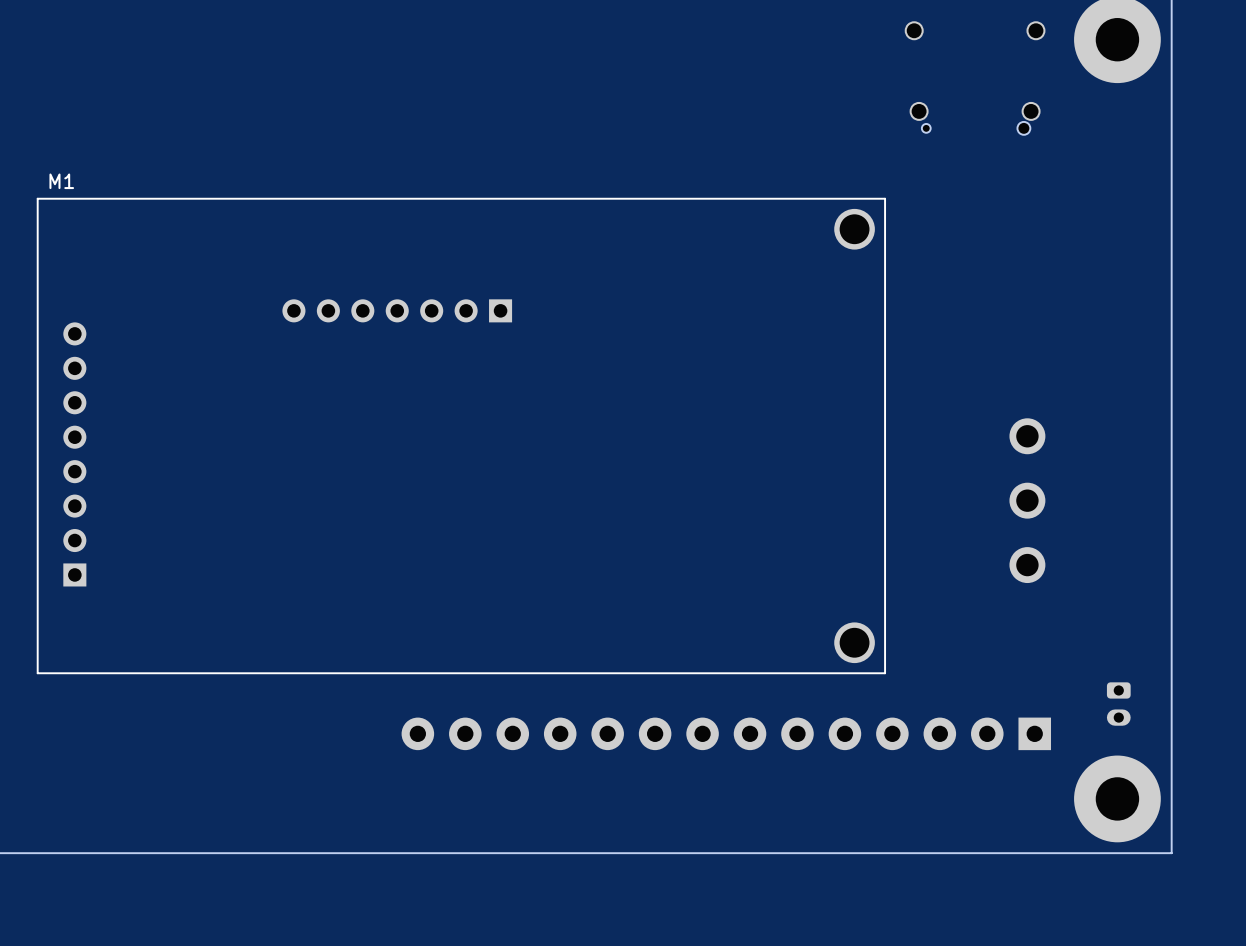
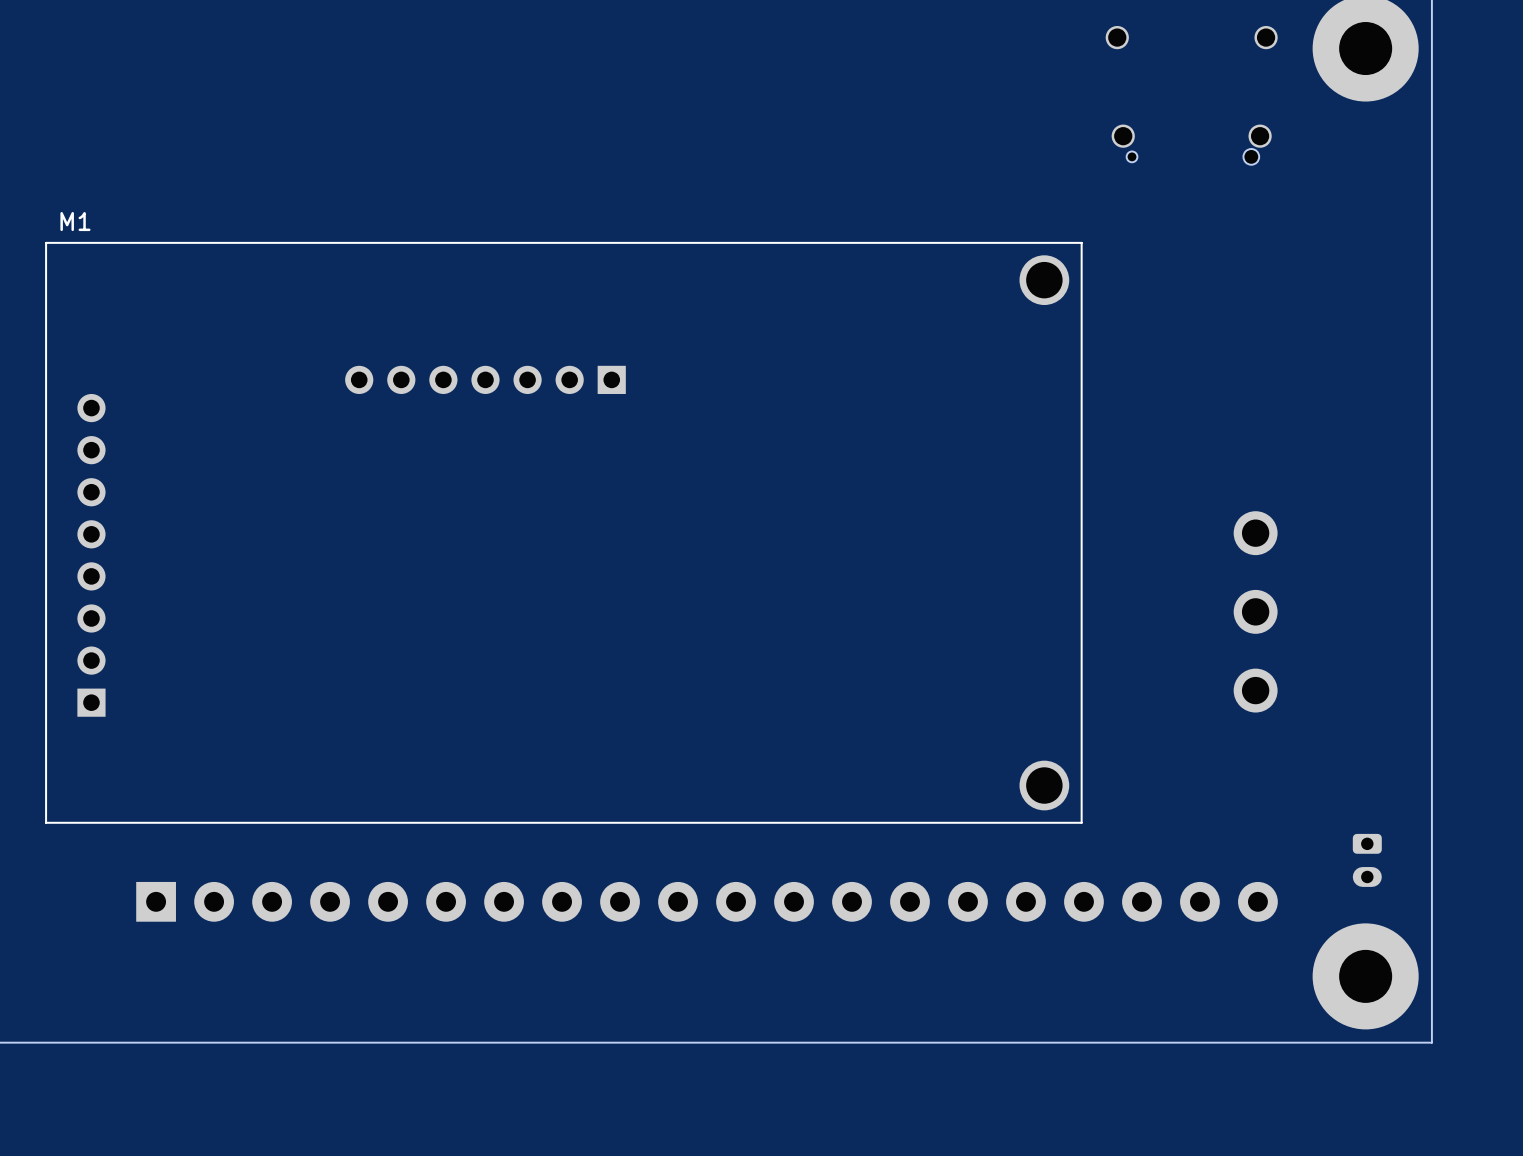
part: (726, 733) -> none
part: none -> (707, 901)

